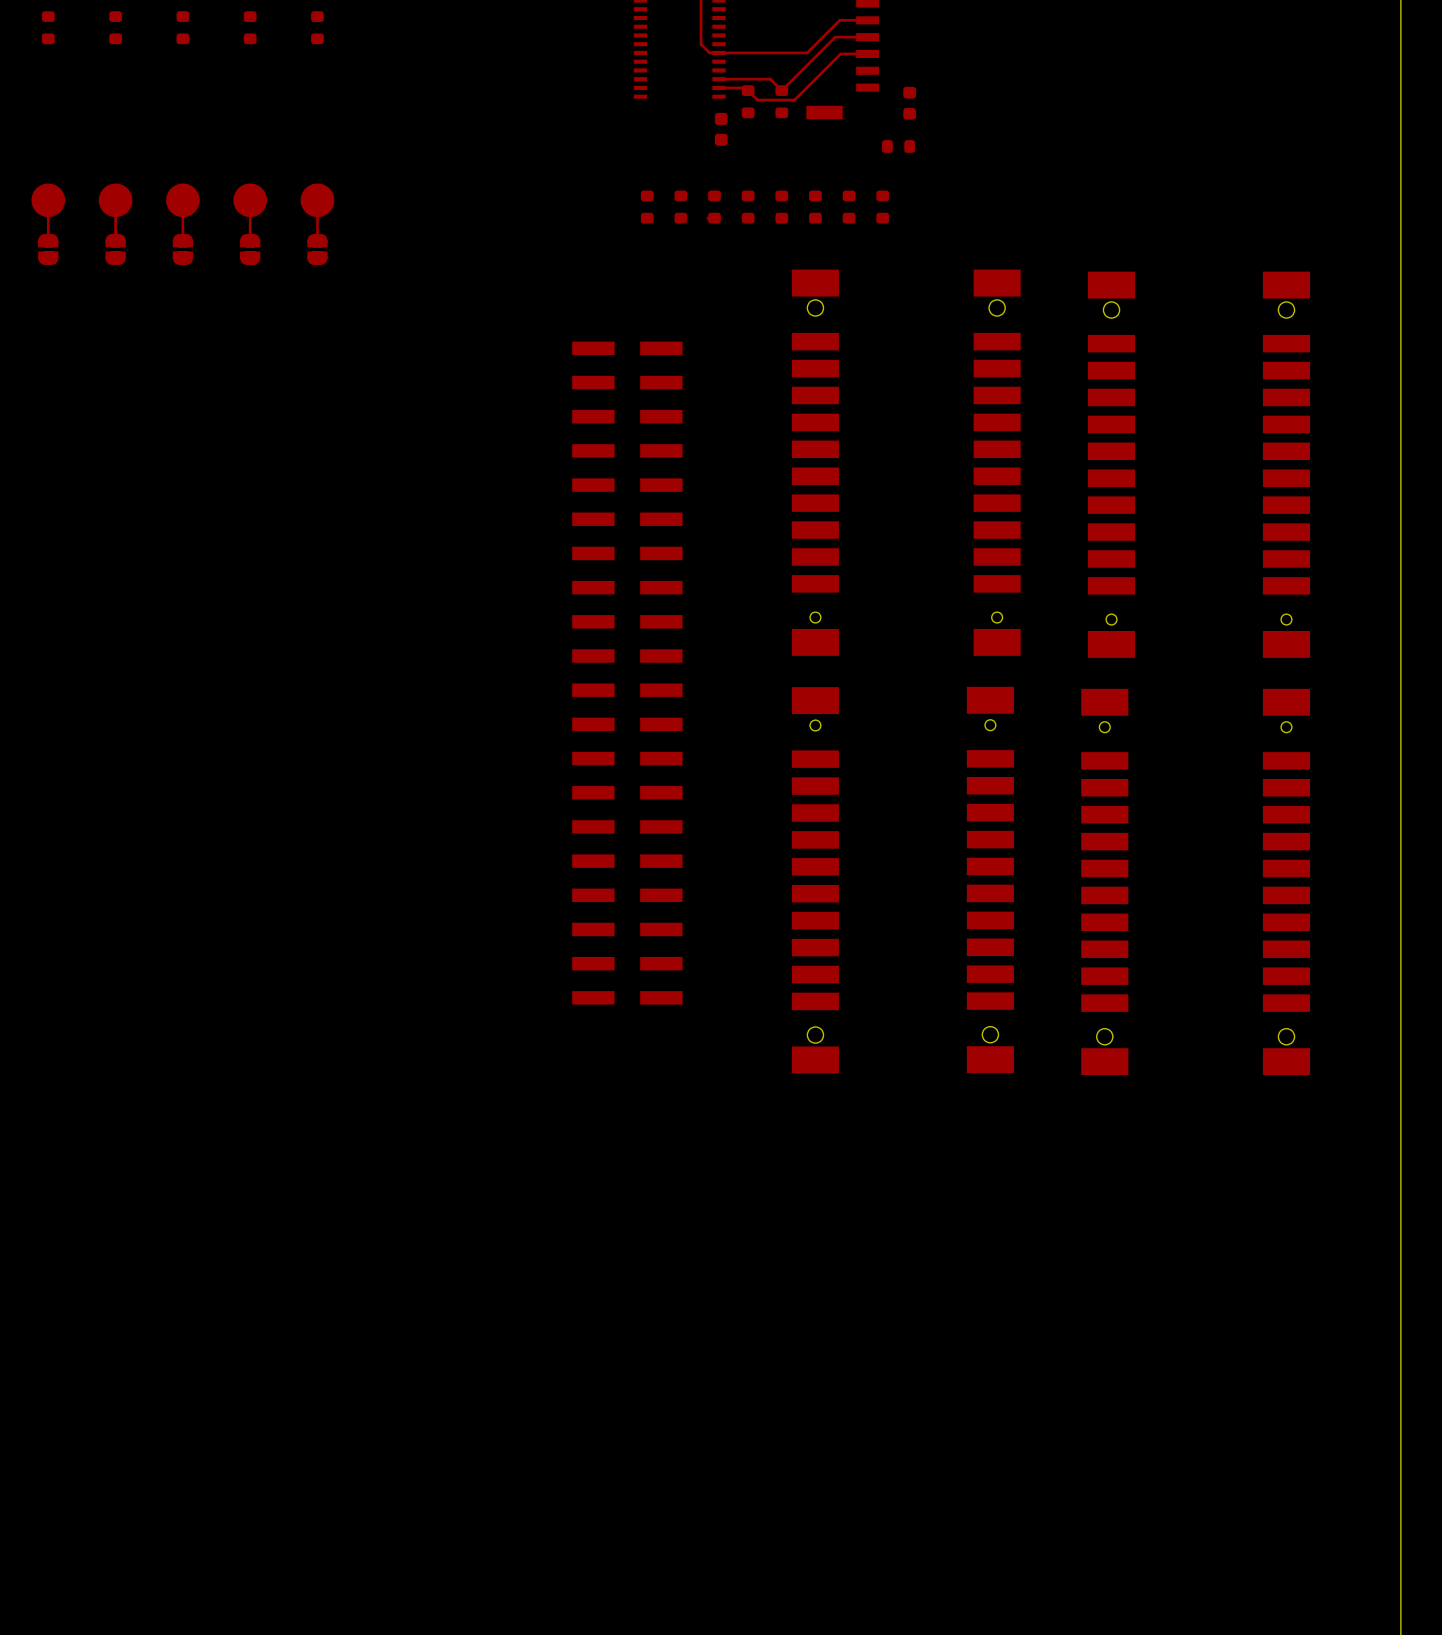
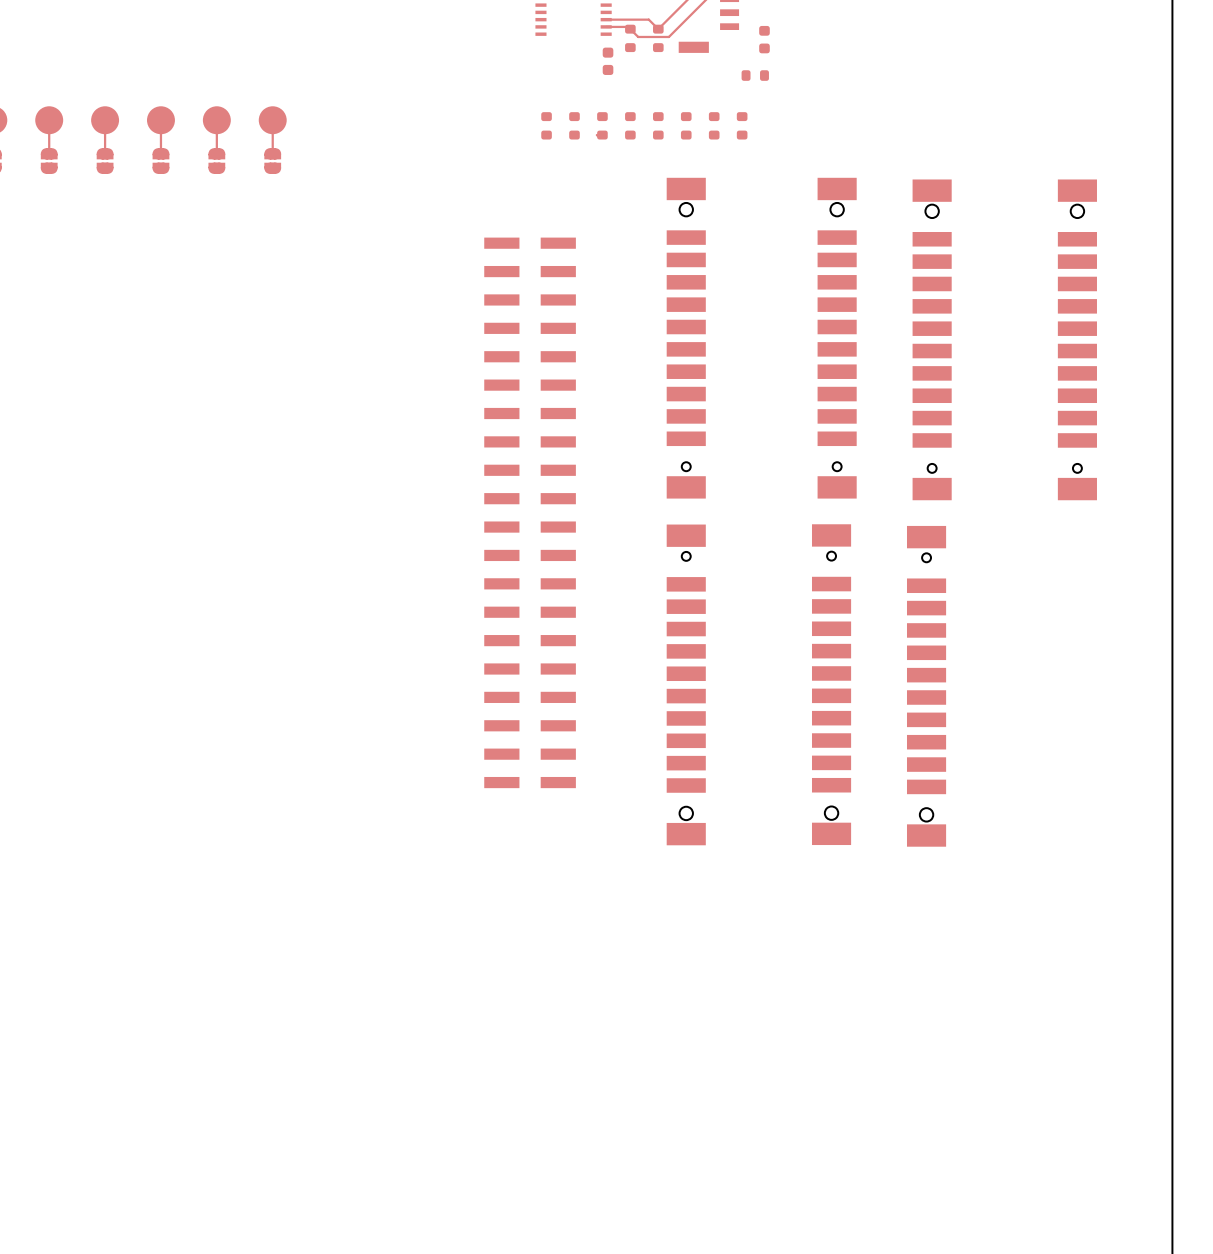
part: (1286, 881) -> none

